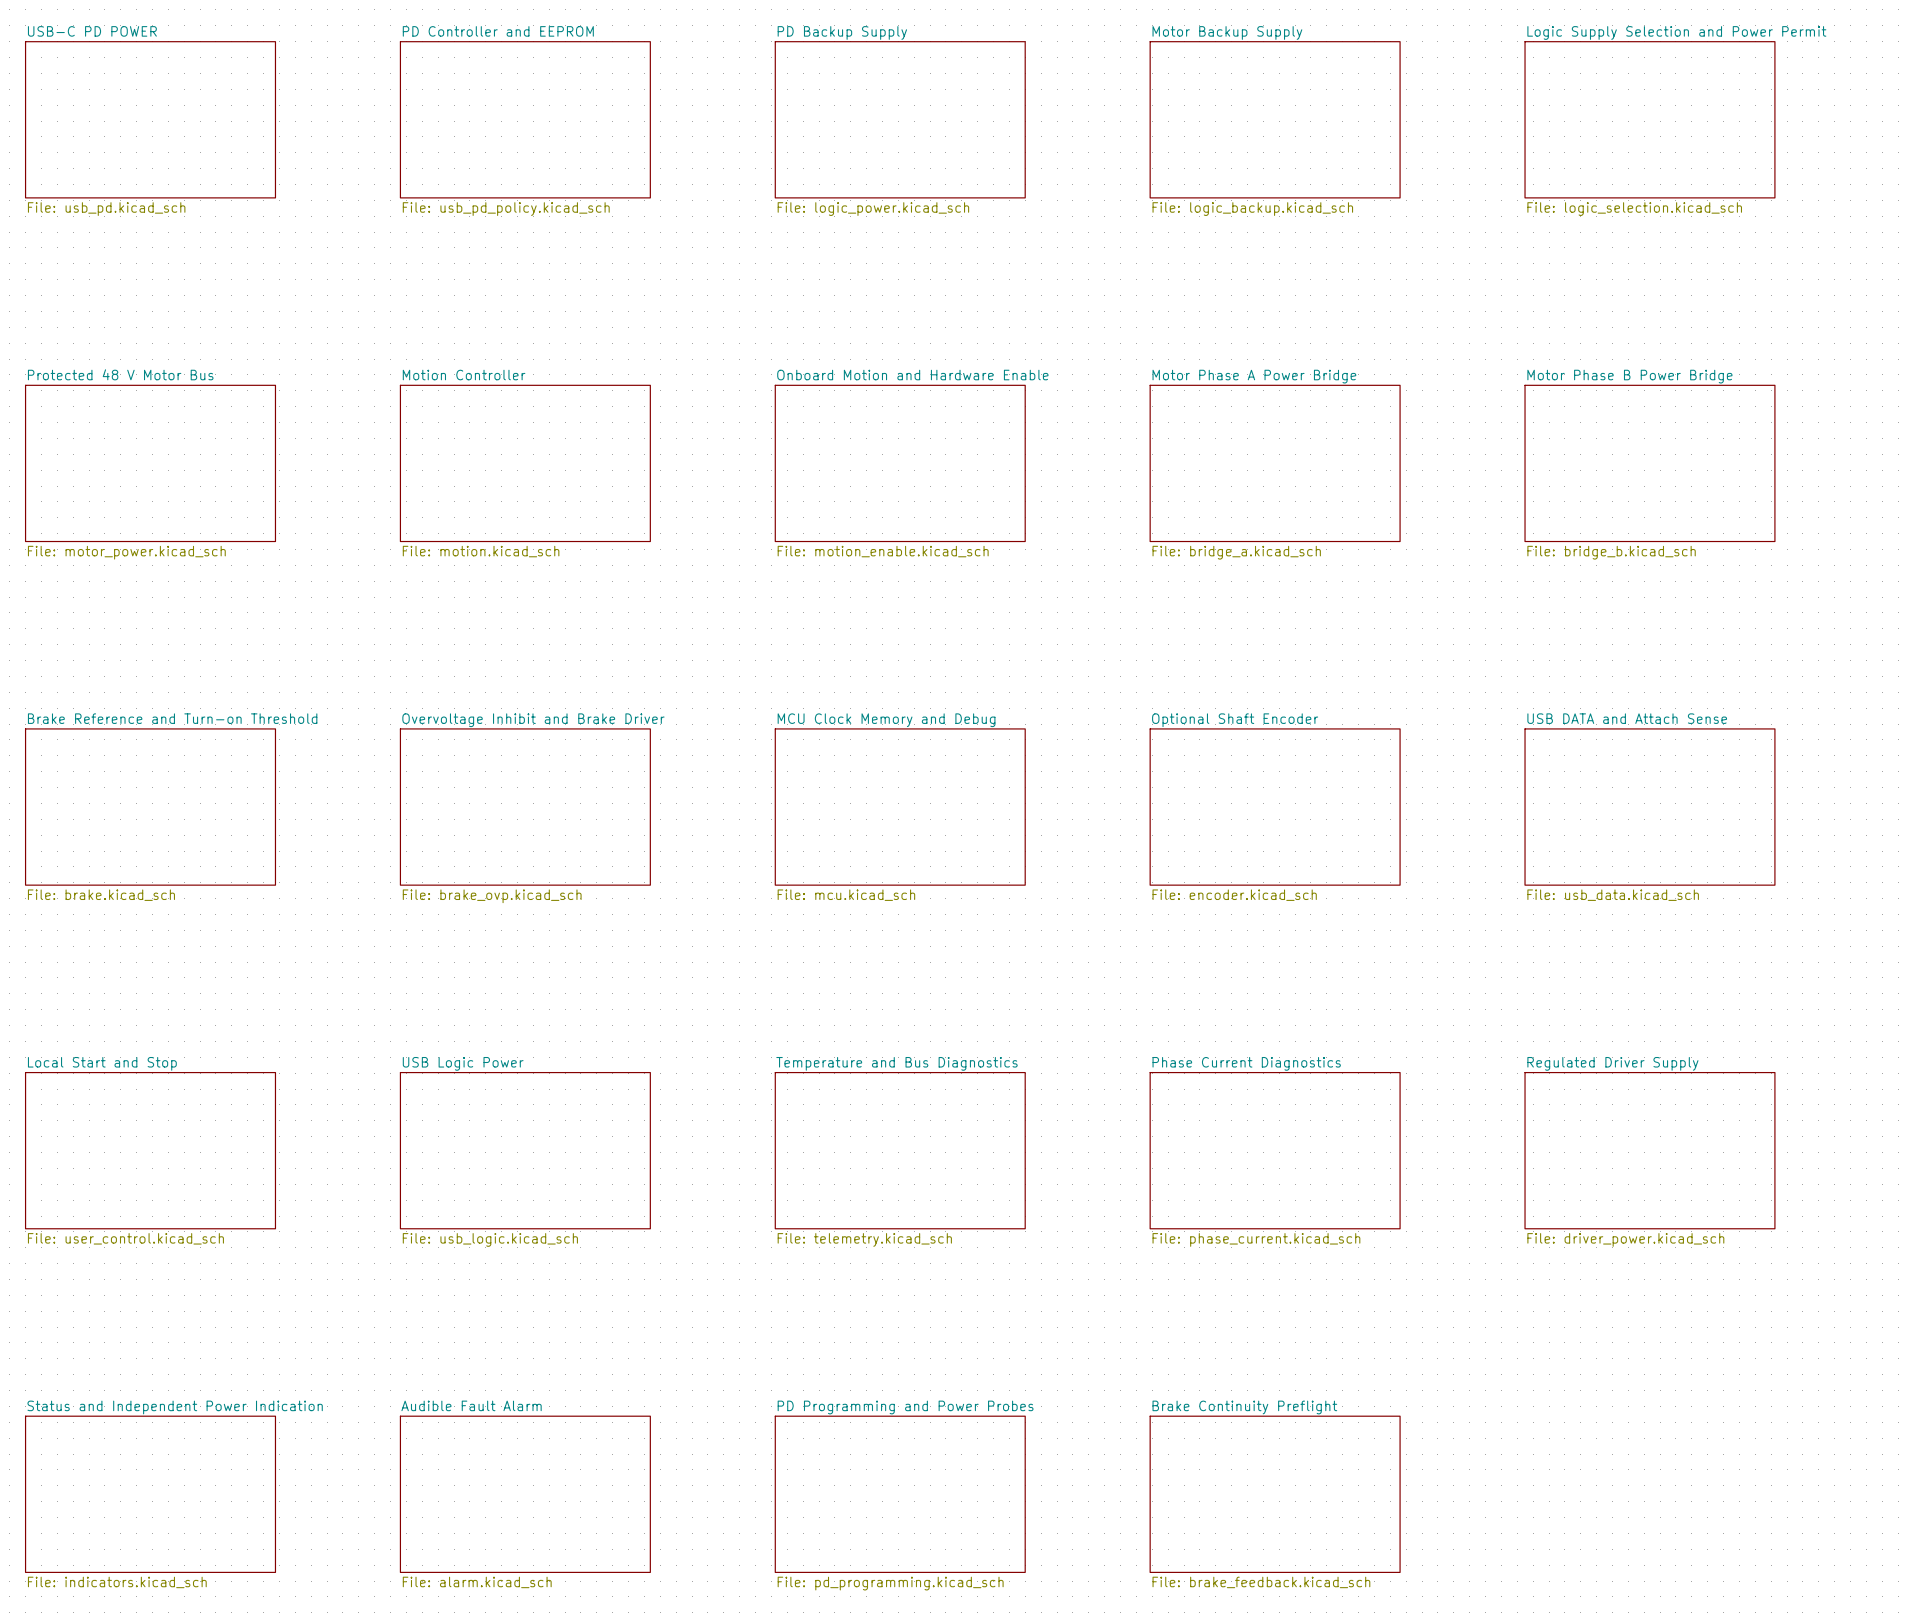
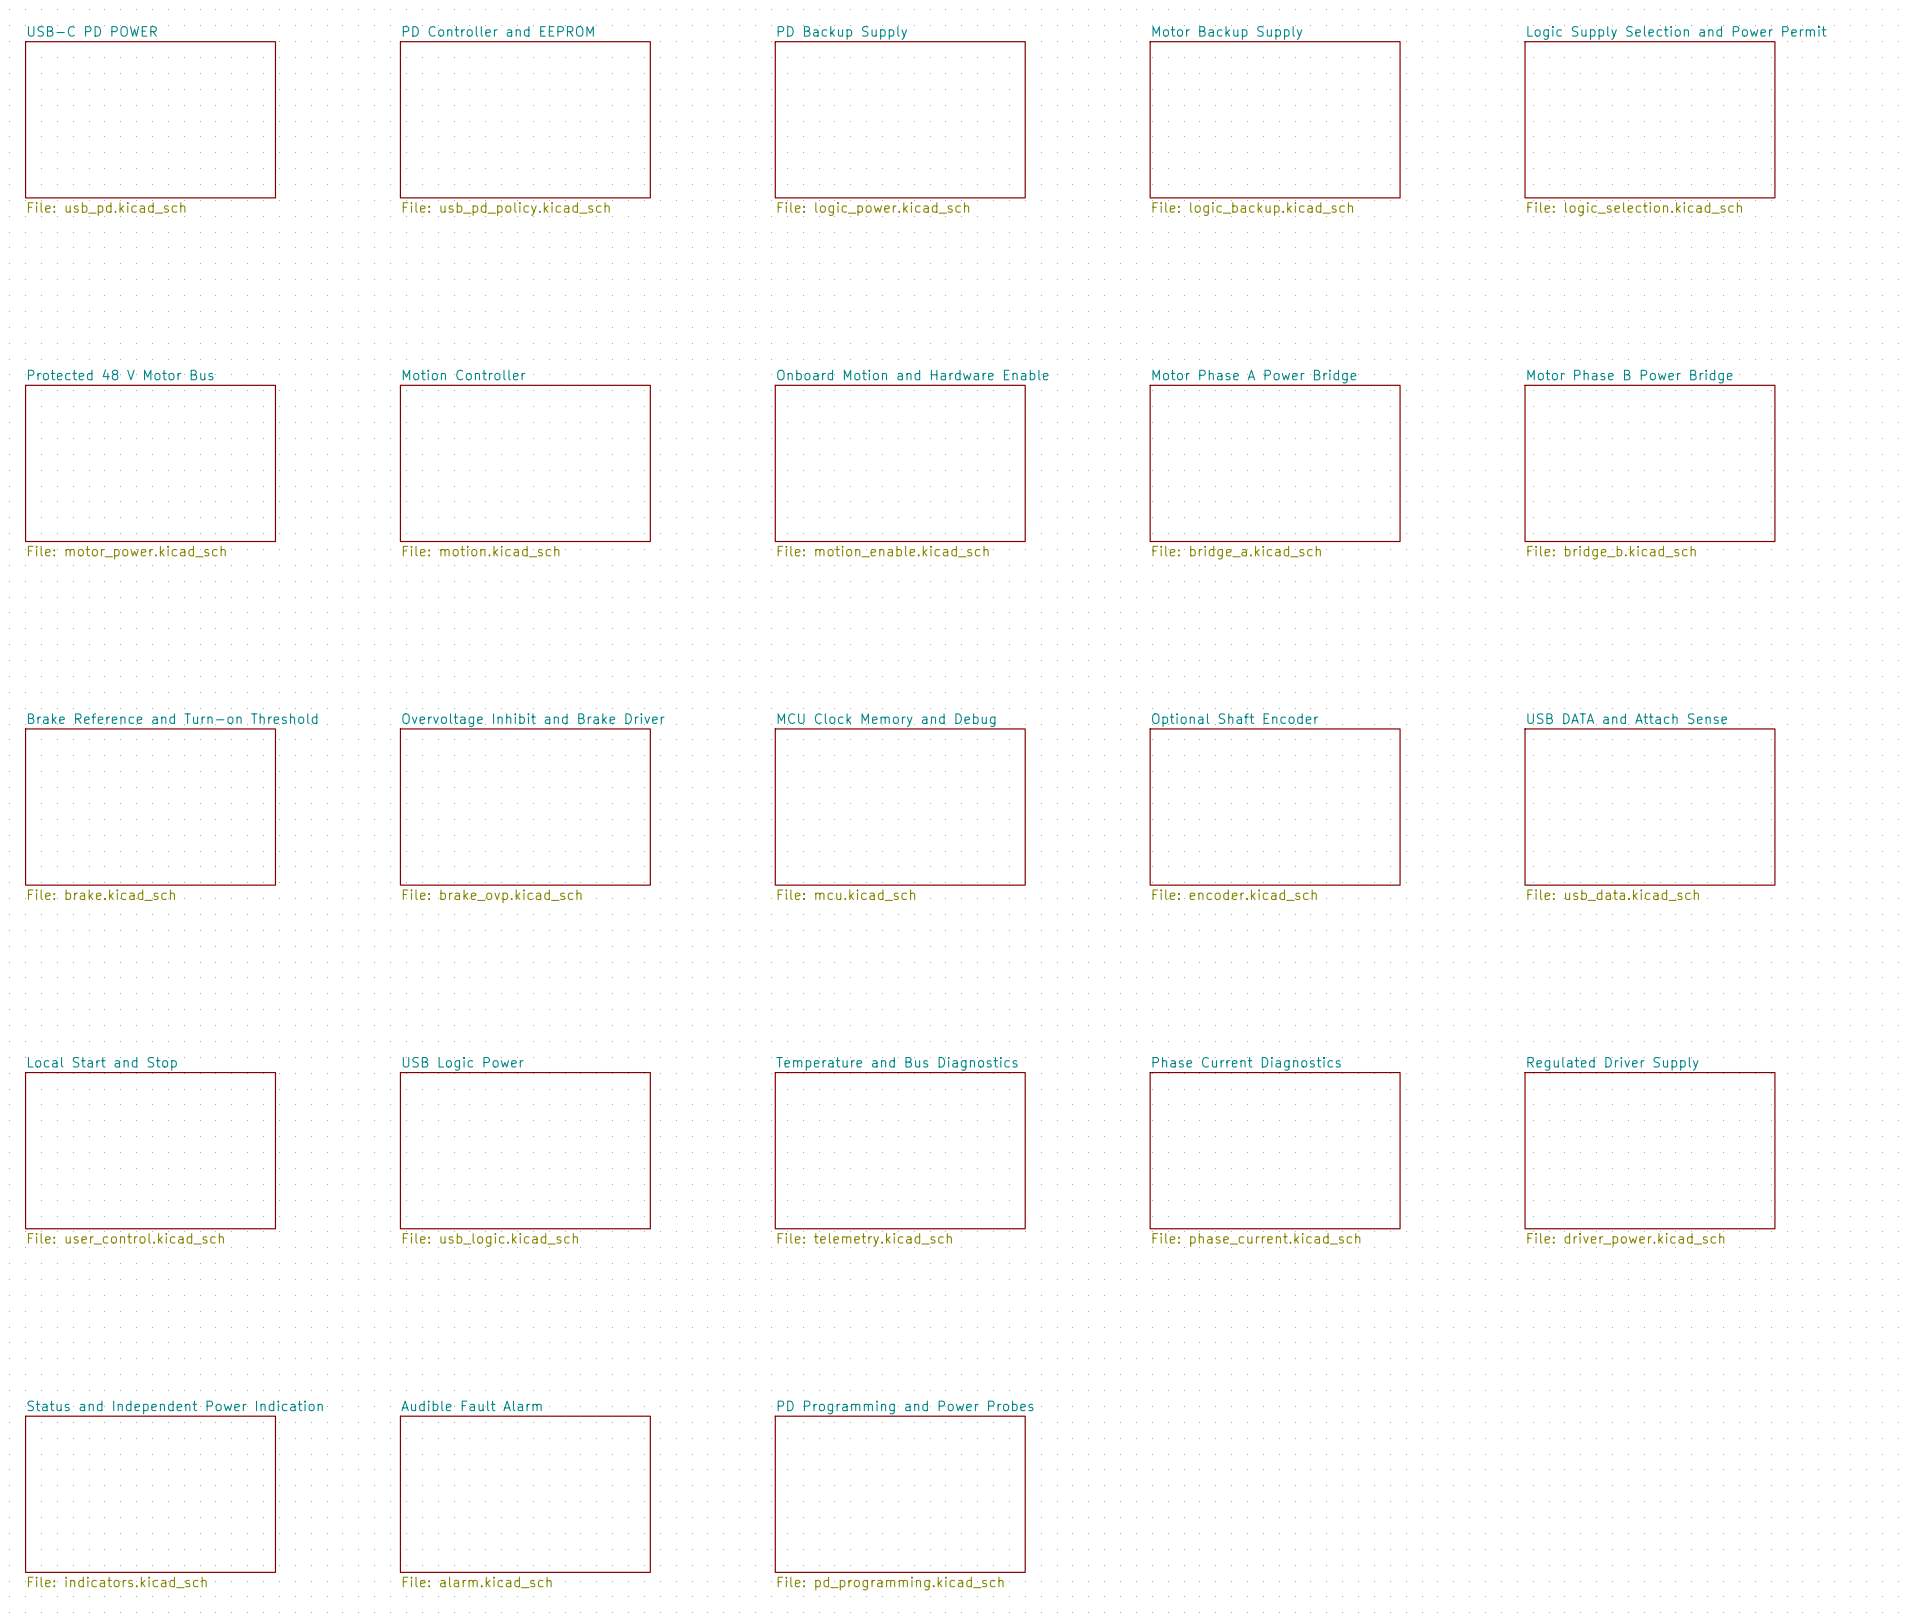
sheet Brake Continuity Preflight: File: brake_feedback.kicad_sch (1275, 1494) -> none

